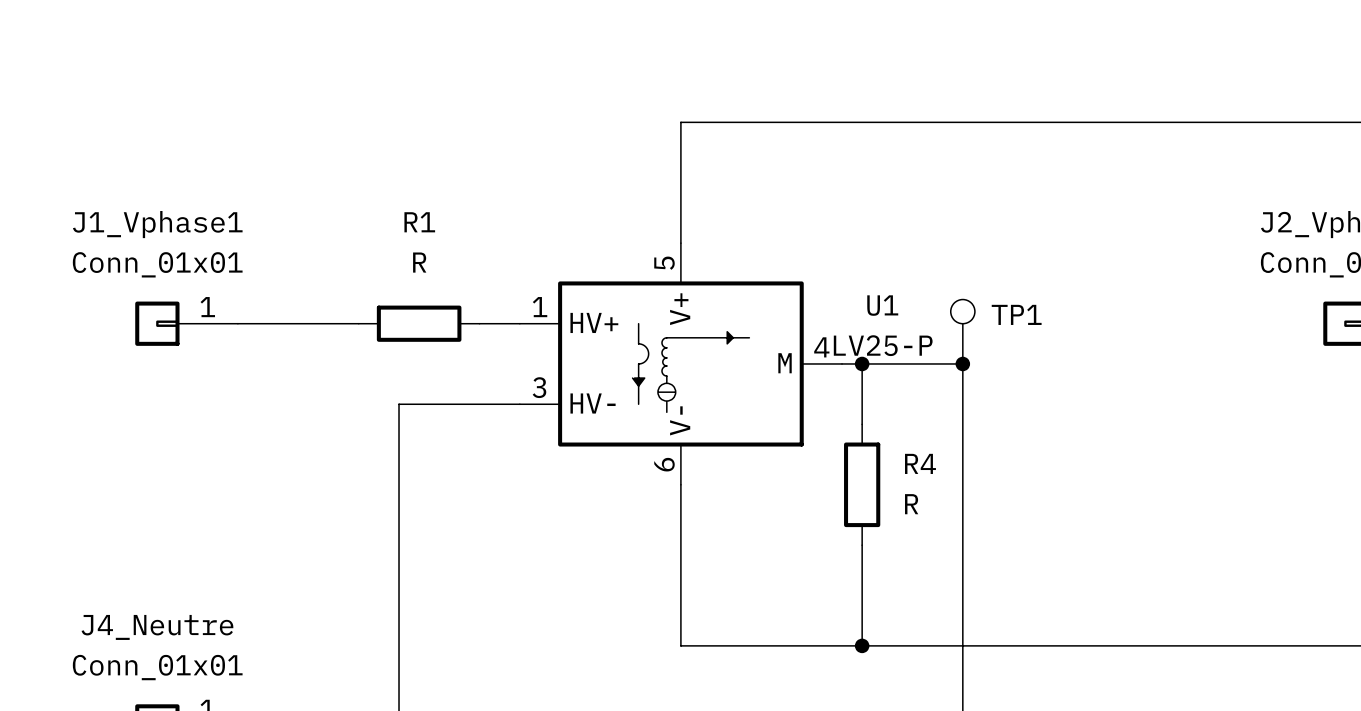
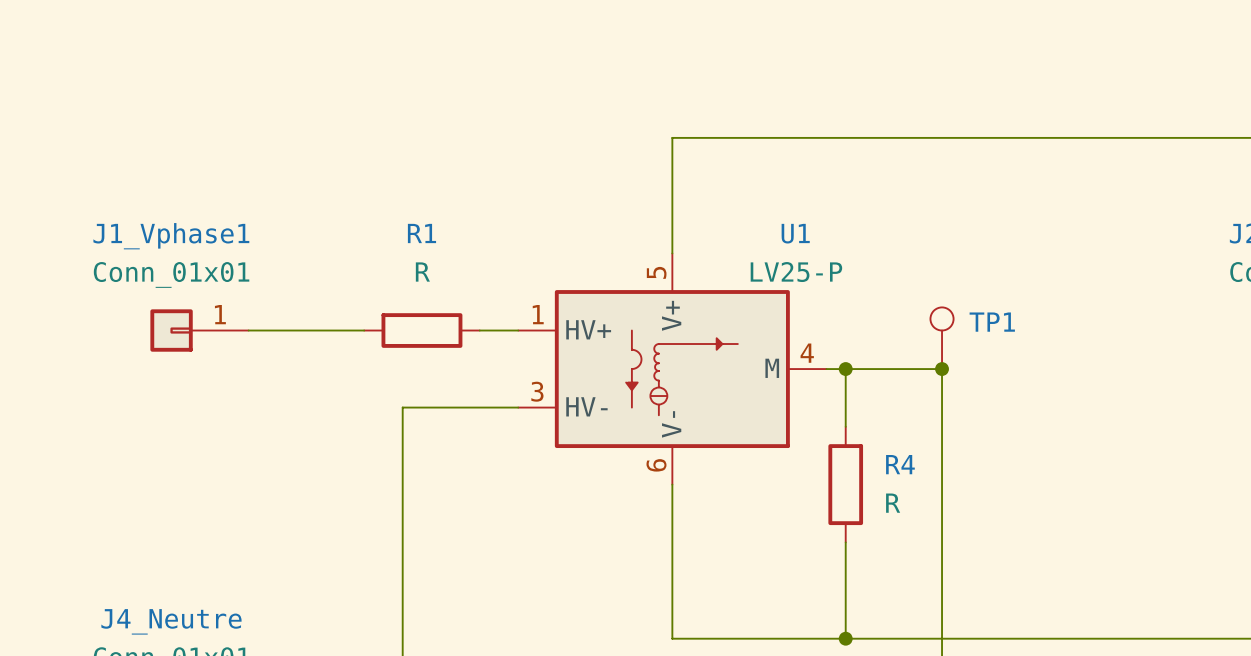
U1 name position: U1 (882, 305) -> U1 (795, 233)
U1 value position: LV25-P (883, 345) -> LV25-P (796, 272)

